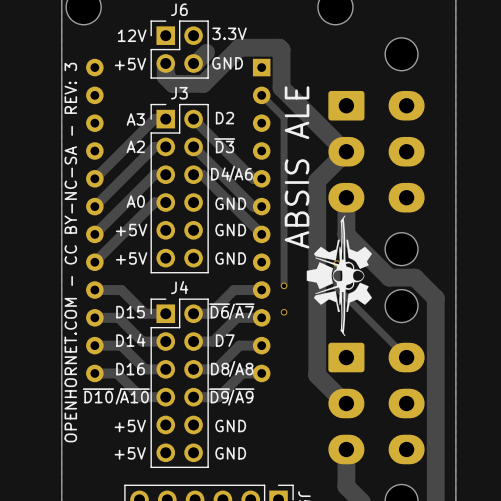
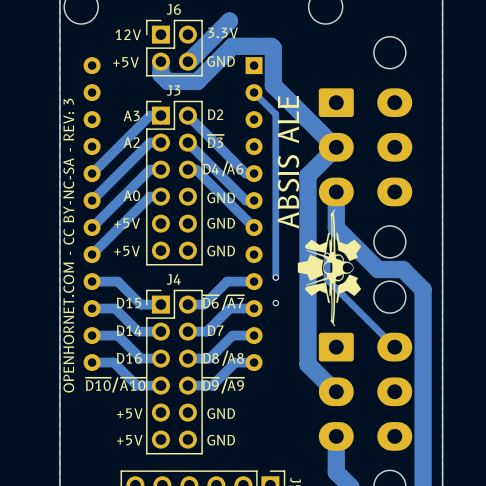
track: (206, 52) (194, 63) -> (229, 21) (188, 61)

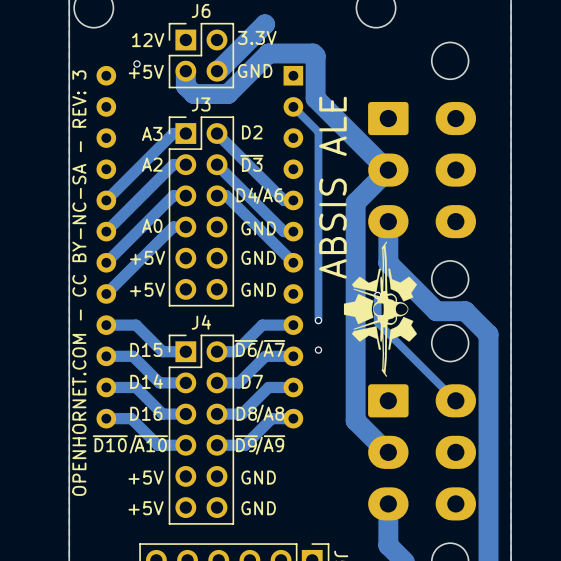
via: none -> (136, 63)

